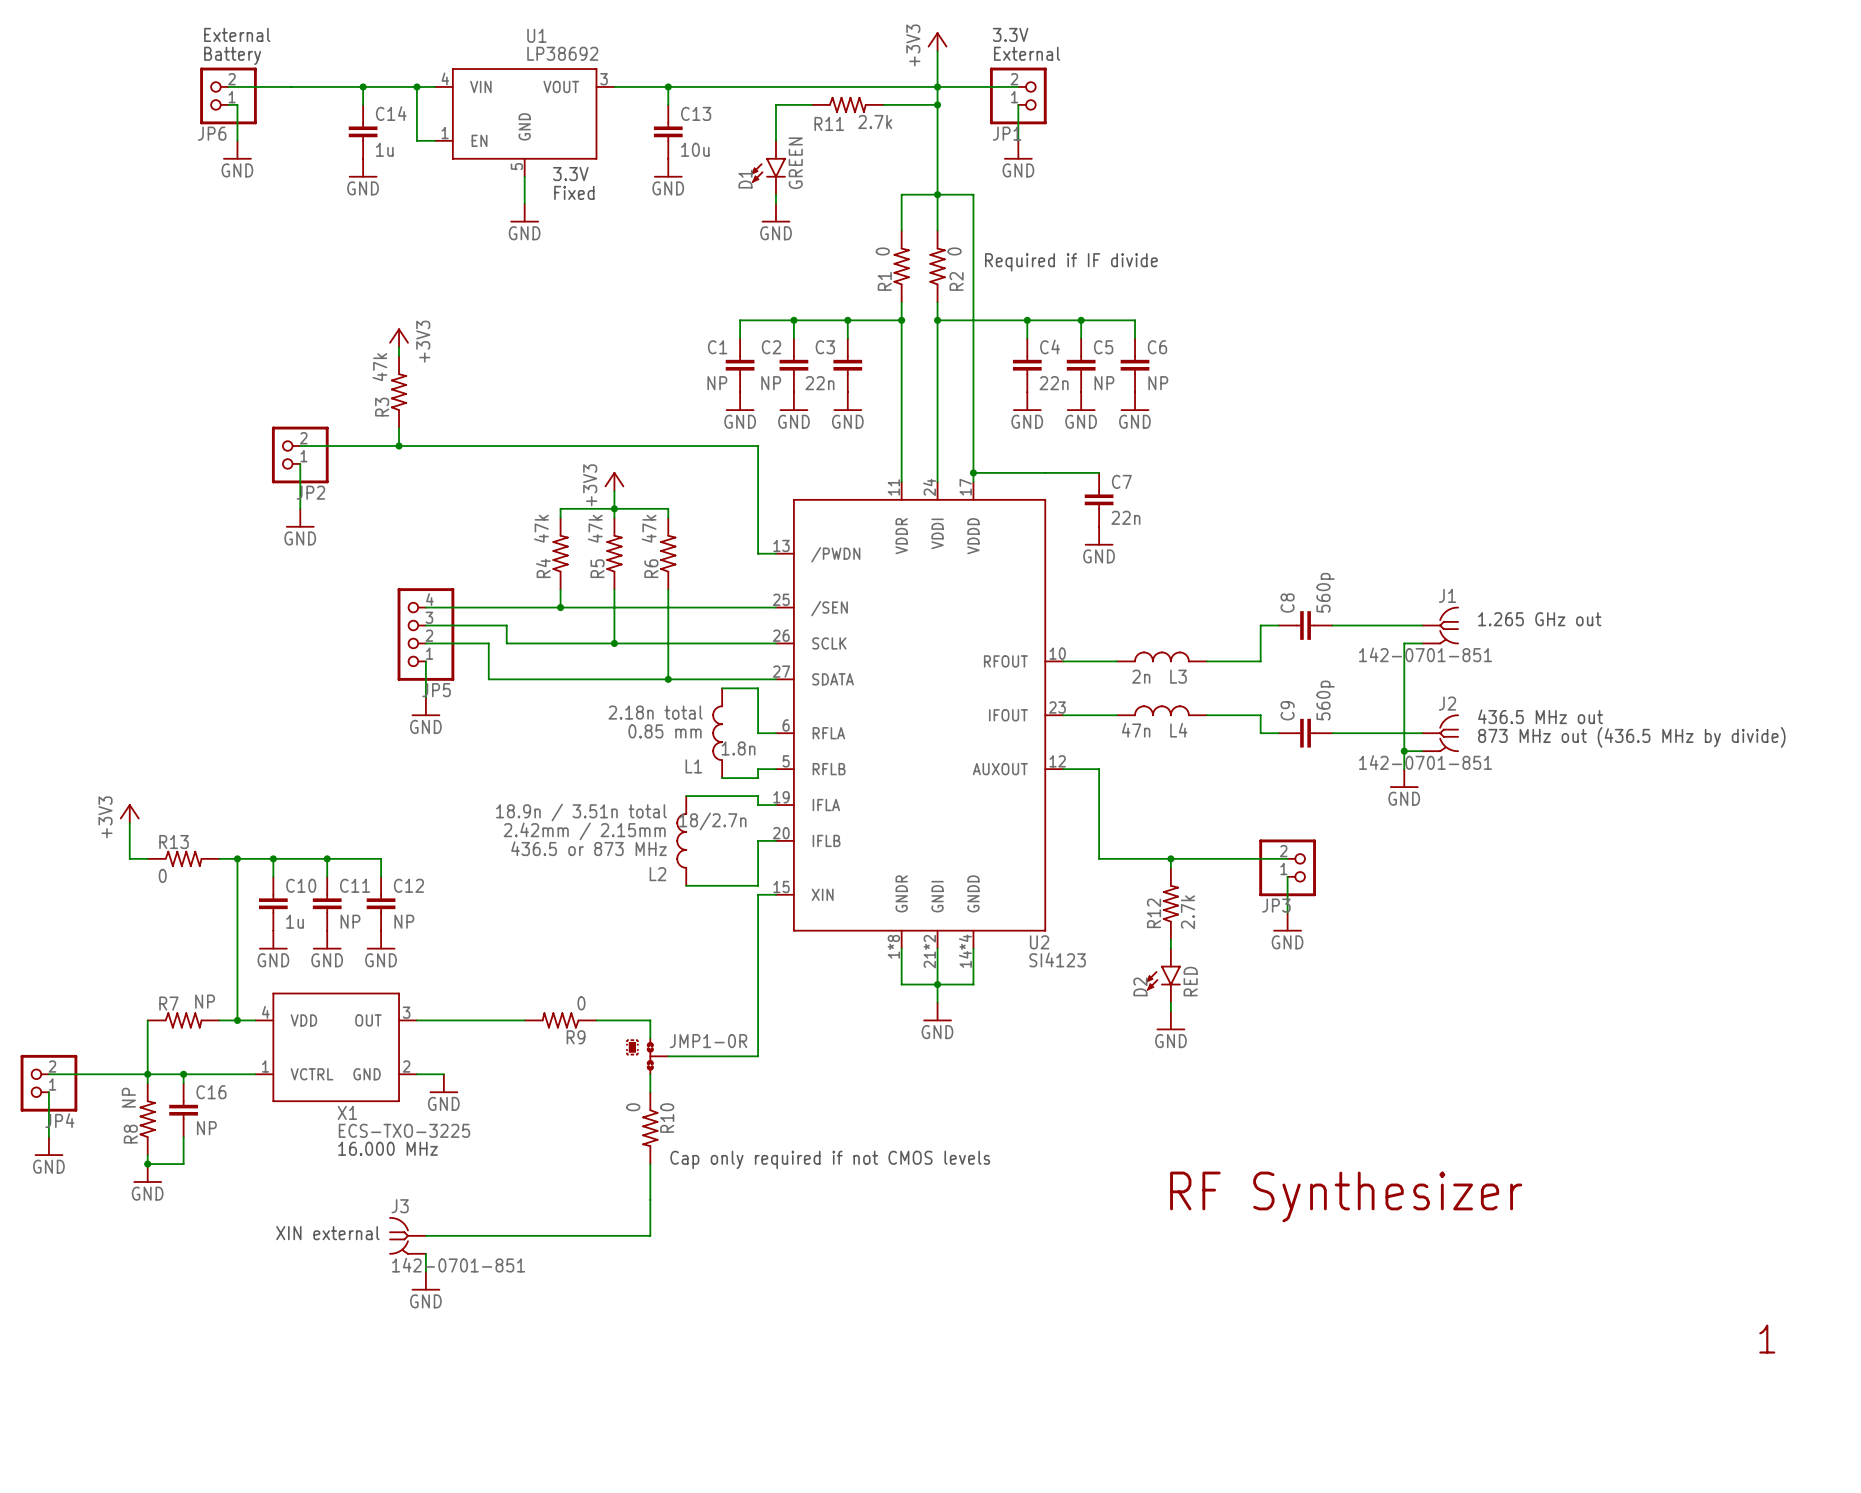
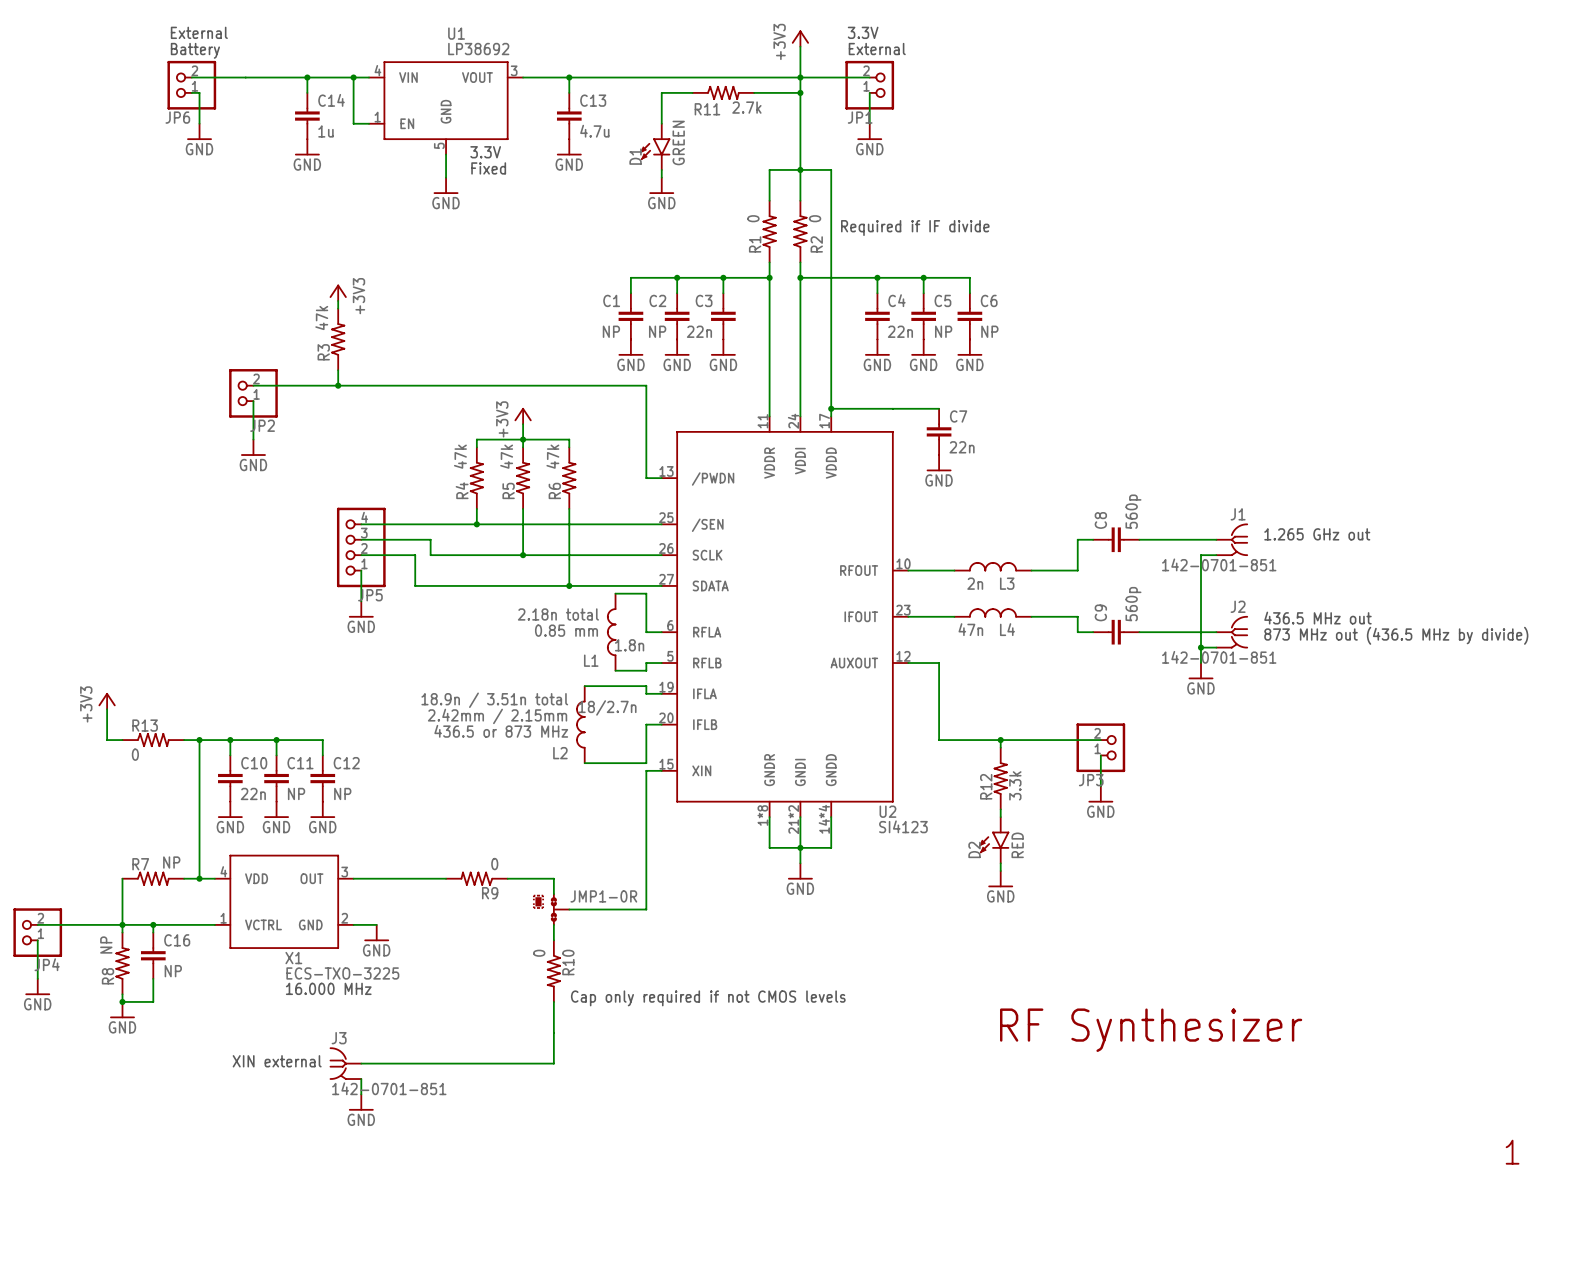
C13 value: 10u (695, 149) -> 4.7u (594, 131)
R12 value: 2.7k (1187, 912) -> 3.3k (1015, 785)
C10 value: 1u (295, 921) -> 22n (253, 793)

